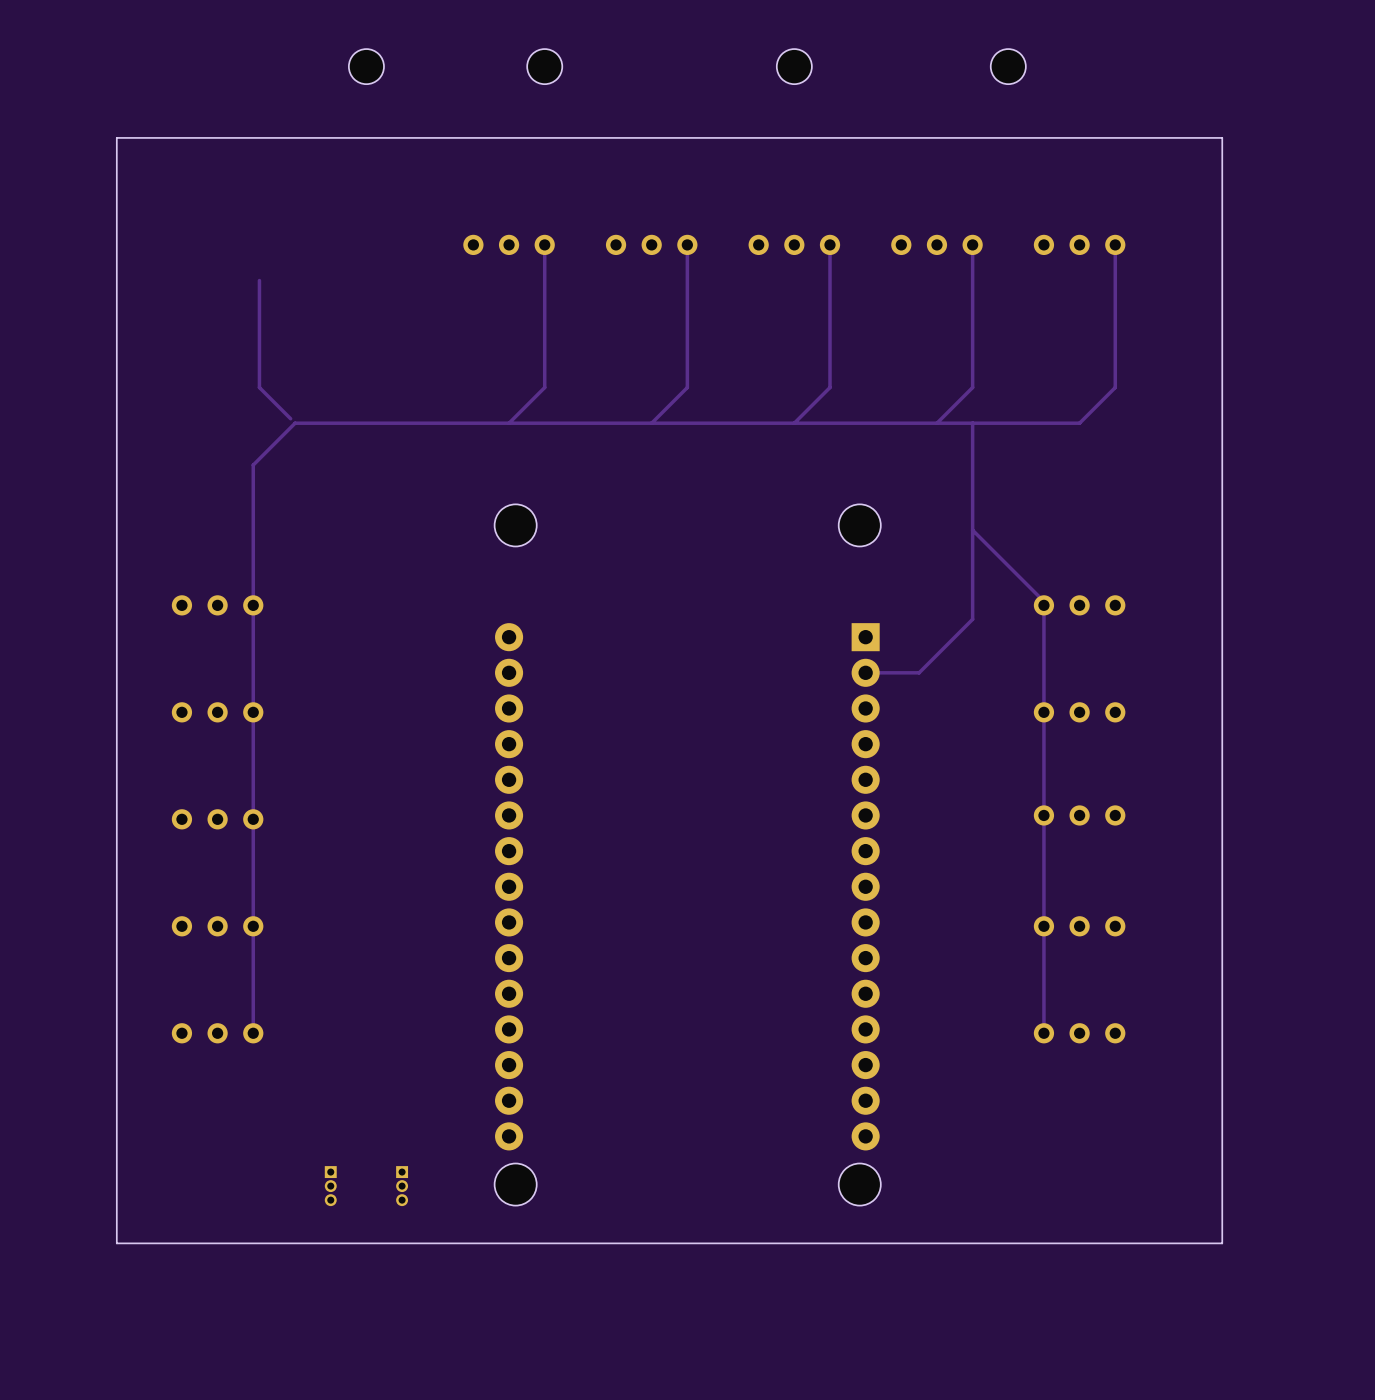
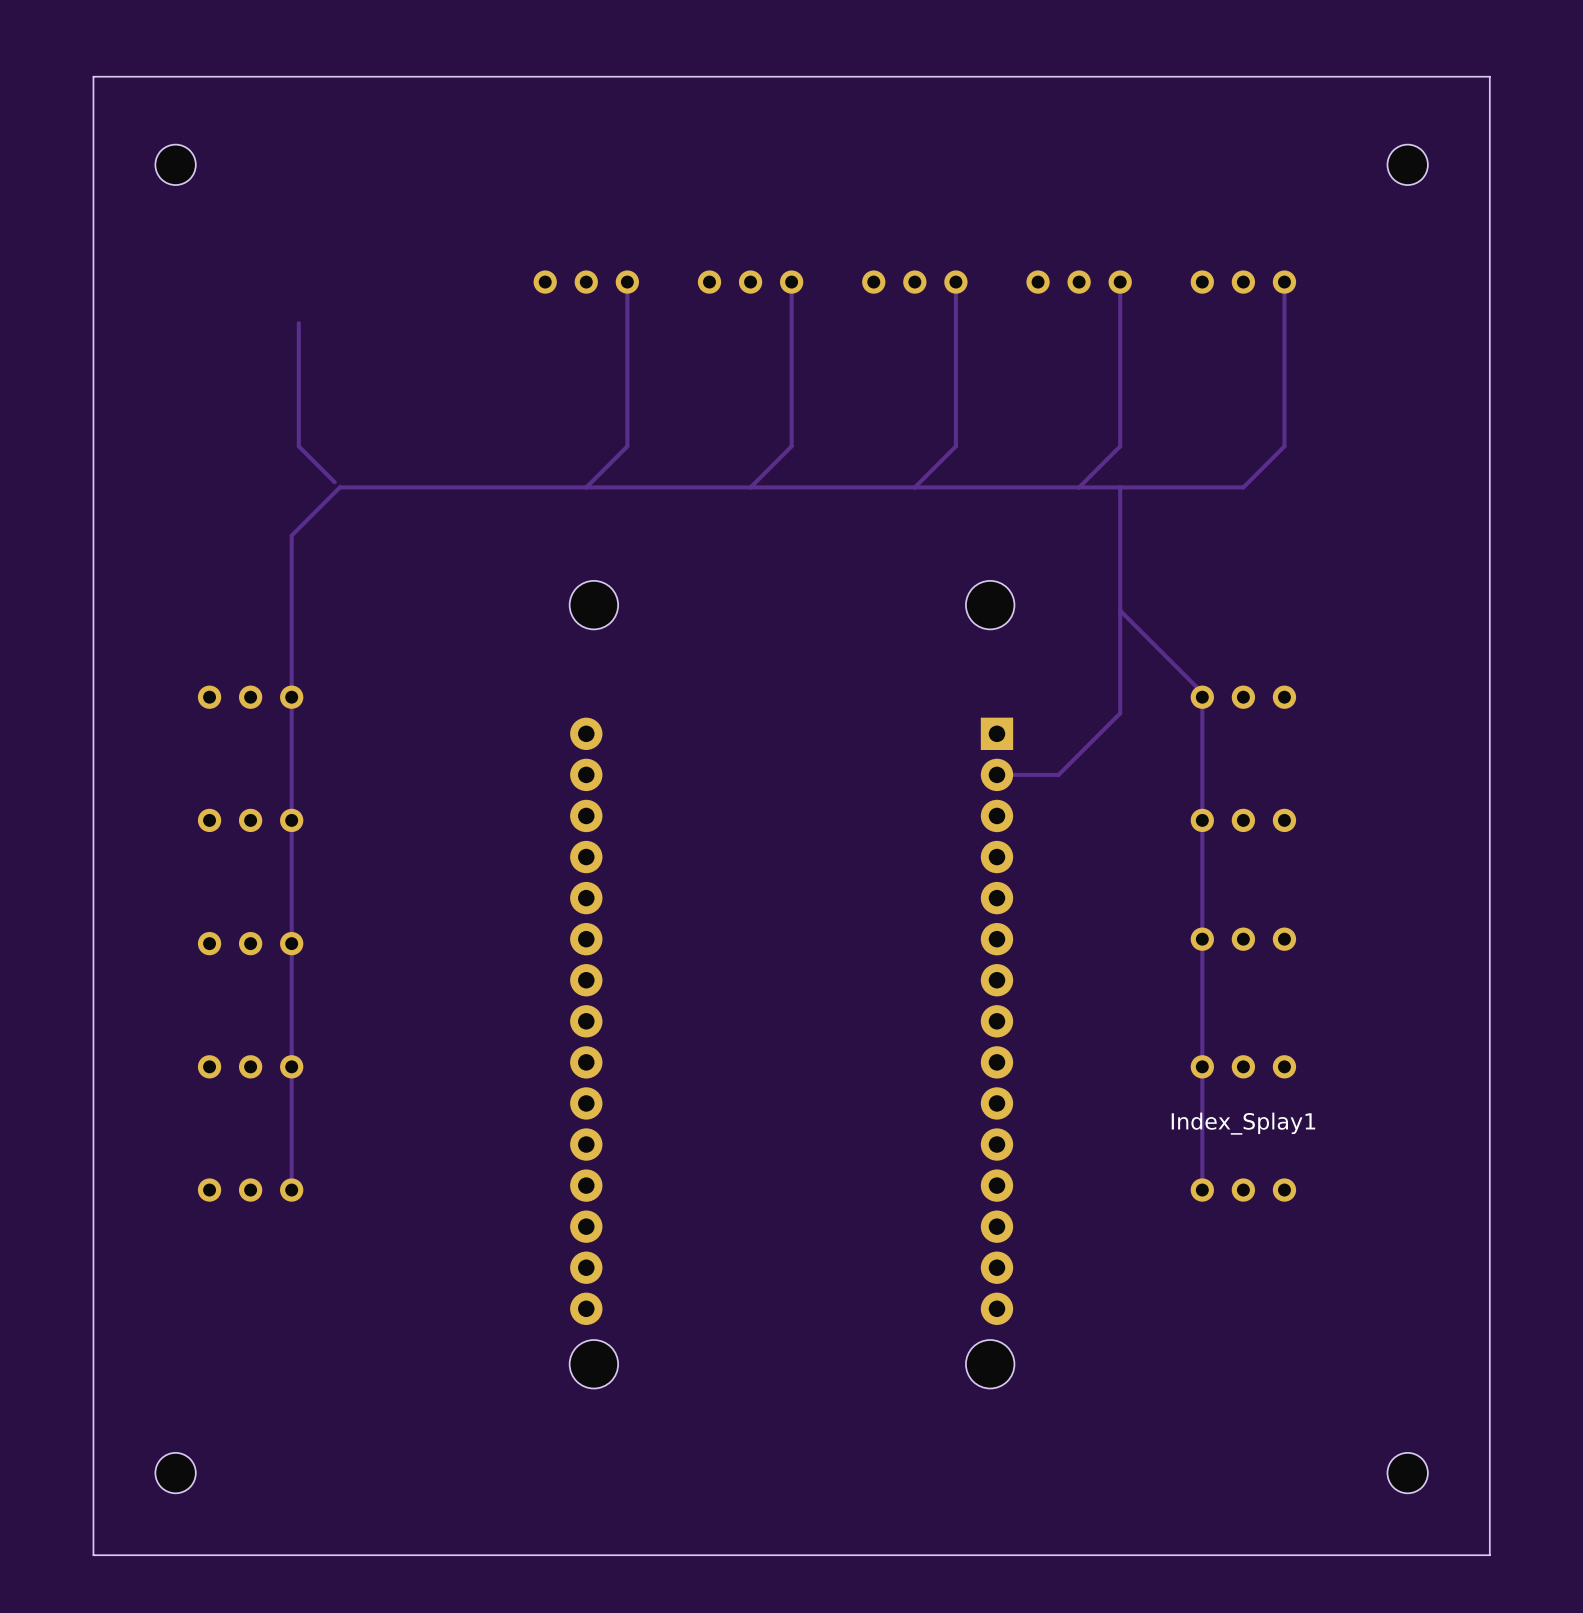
part: (366, 66) -> none
part: (544, 66) -> none
part: (794, 66) -> none
part: (1008, 66) -> none
board edge: (1222, 137) (1222, 1243) (116, 1243) (116, 137) (1222, 137) -> (1489, 76) (1489, 1555) (93, 1555) (93, 76) (1489, 76)
part: none -> (175, 164)
part: none -> (1407, 164)
Index_Splay1 name: none -> Index_Splay1 (1243, 1123)
part: (330, 1186) -> none
part: (402, 1186) -> none
part: none -> (175, 1473)
part: none -> (1407, 1473)

